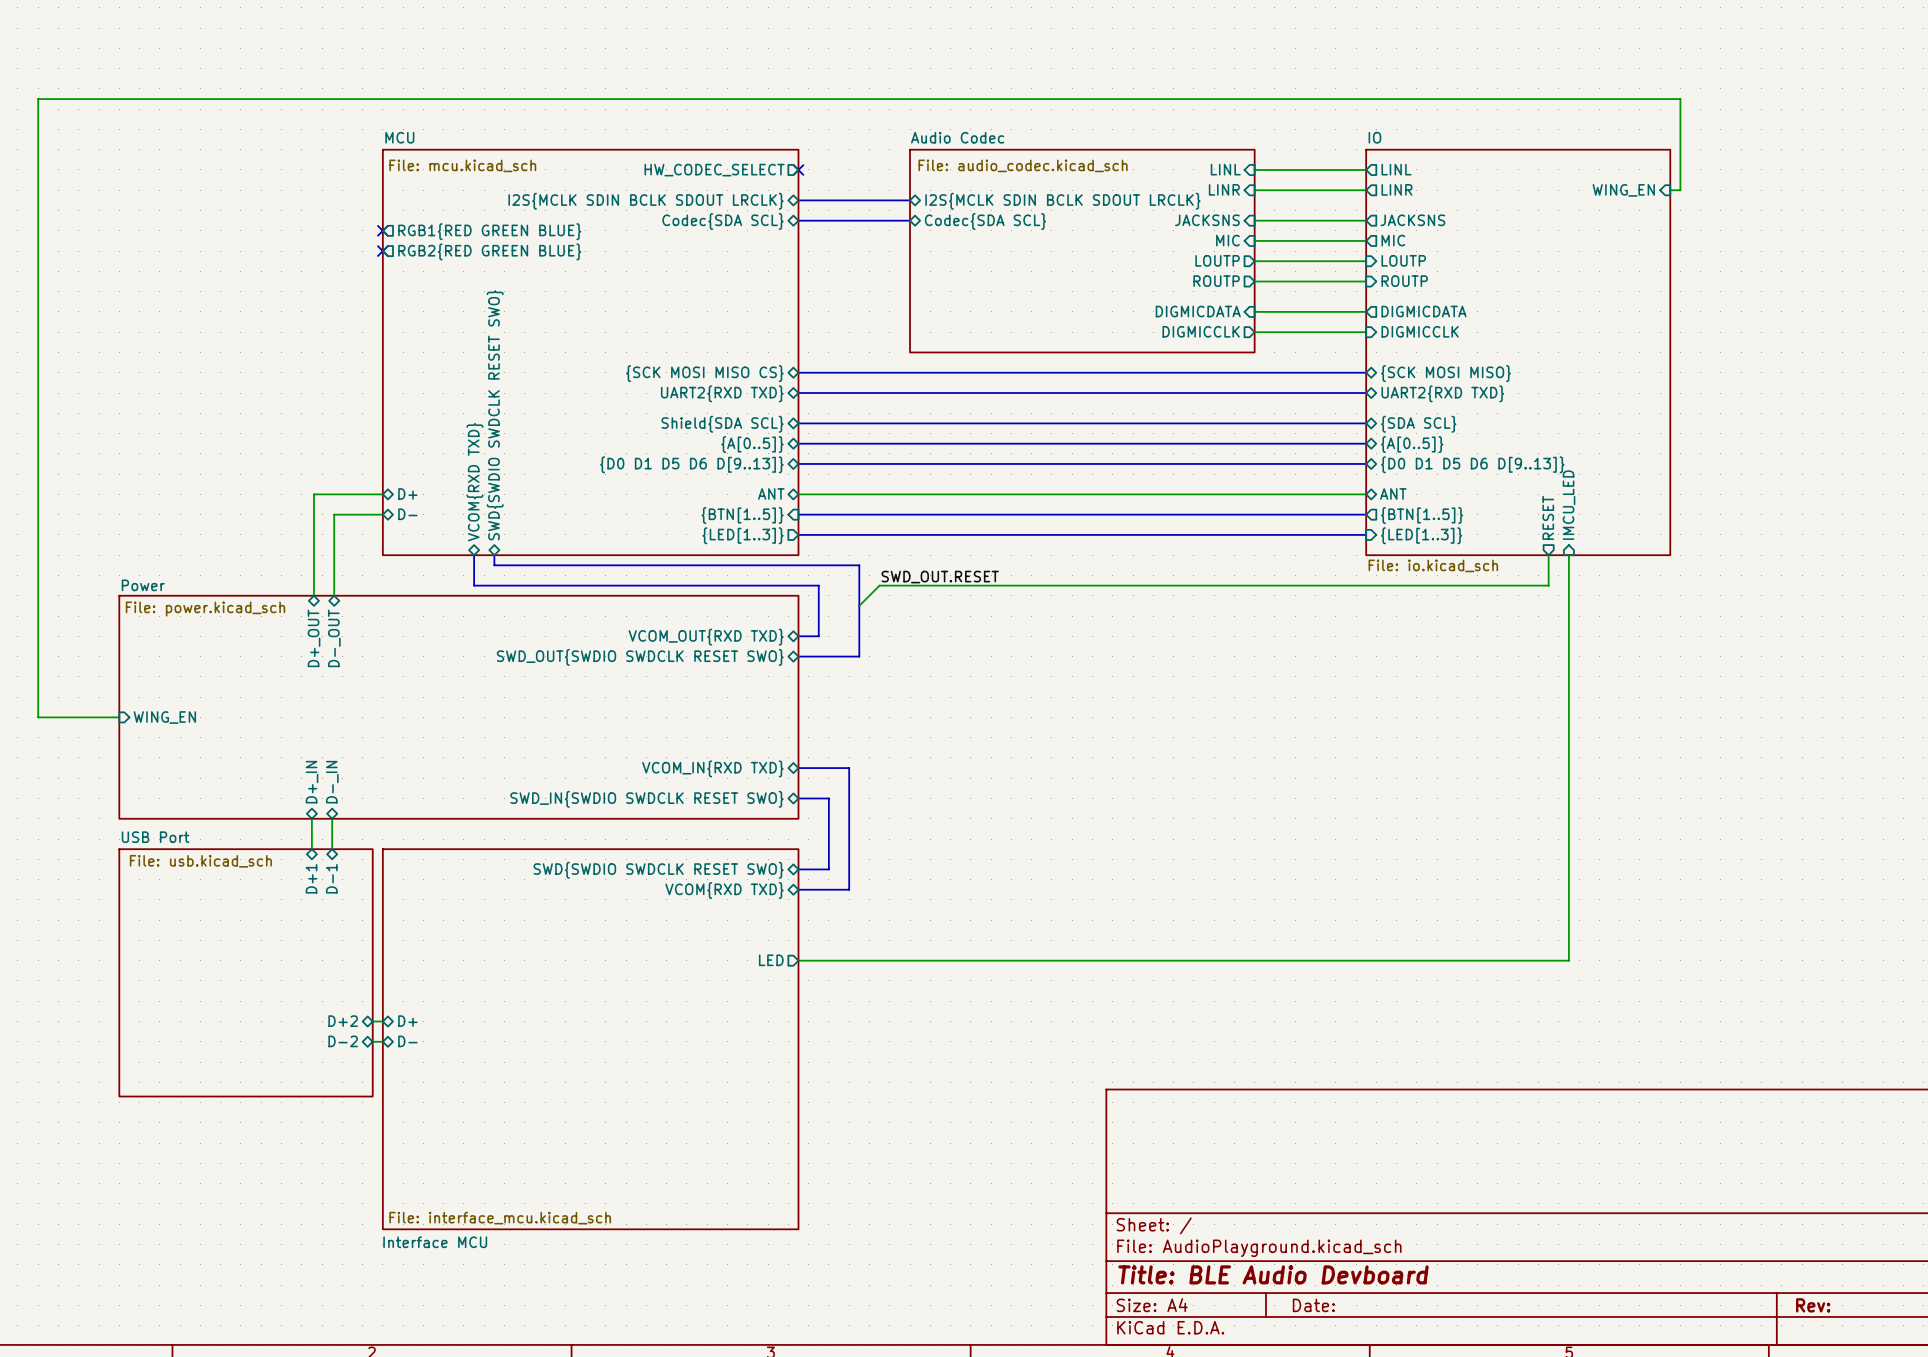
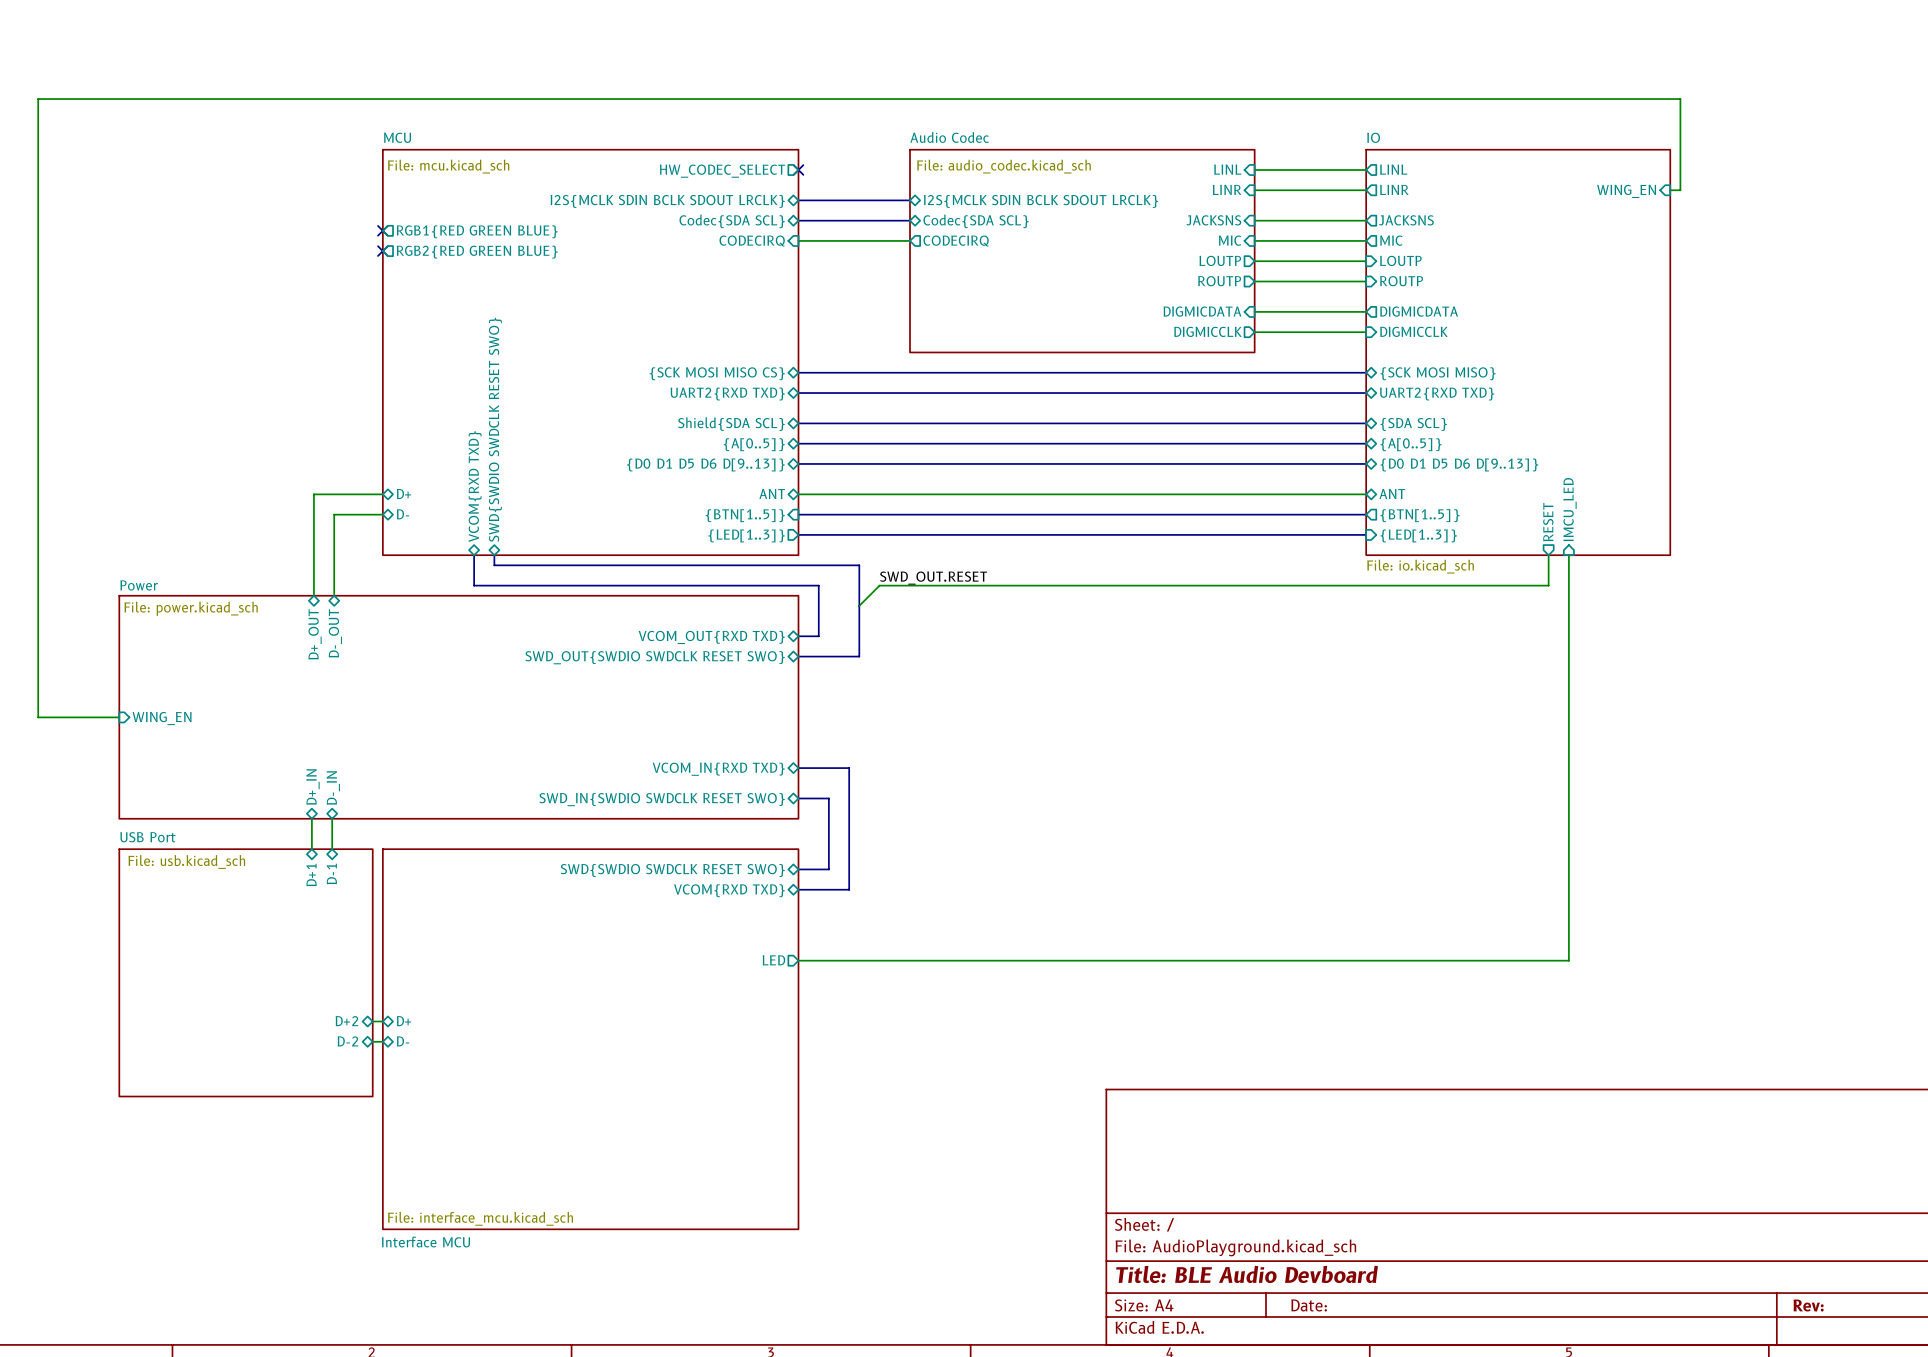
wire: none -> (798, 240) (910, 240)
sheet pin: none -> CODECIRQ (752, 241)
sheet pin: none -> CODECIRQ (956, 241)

